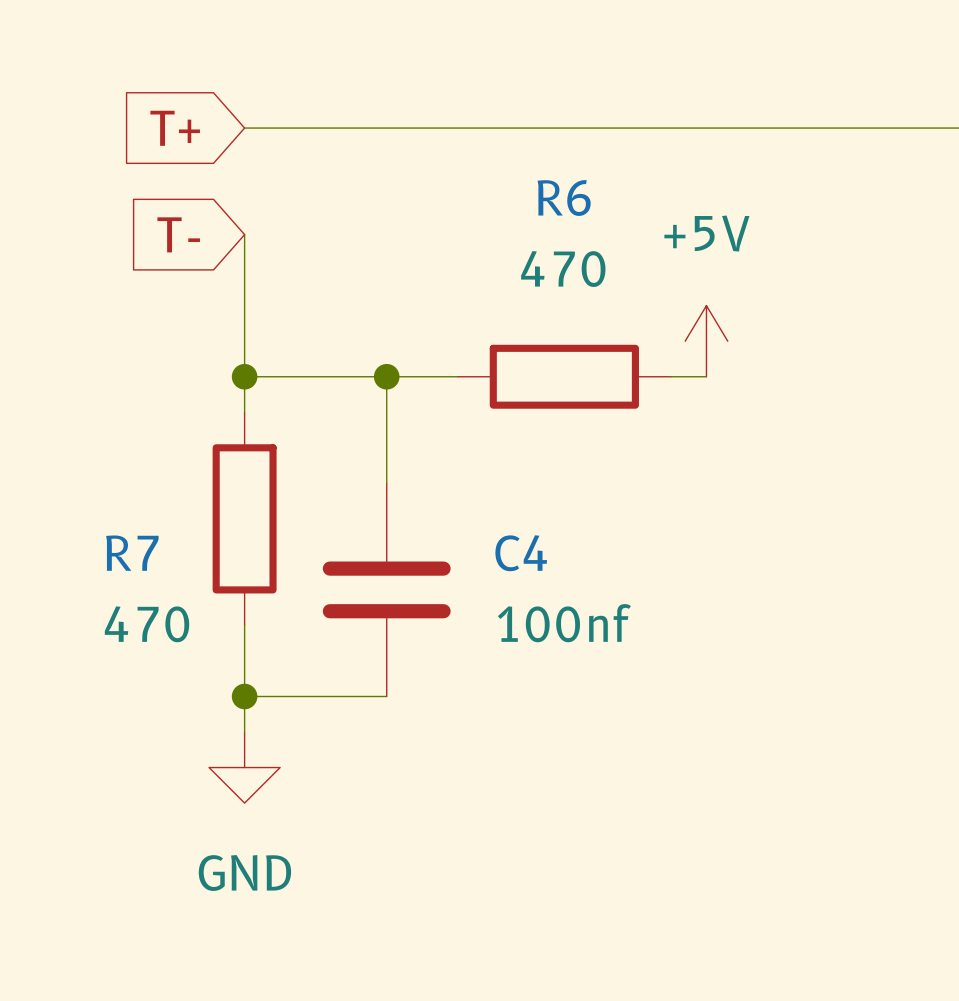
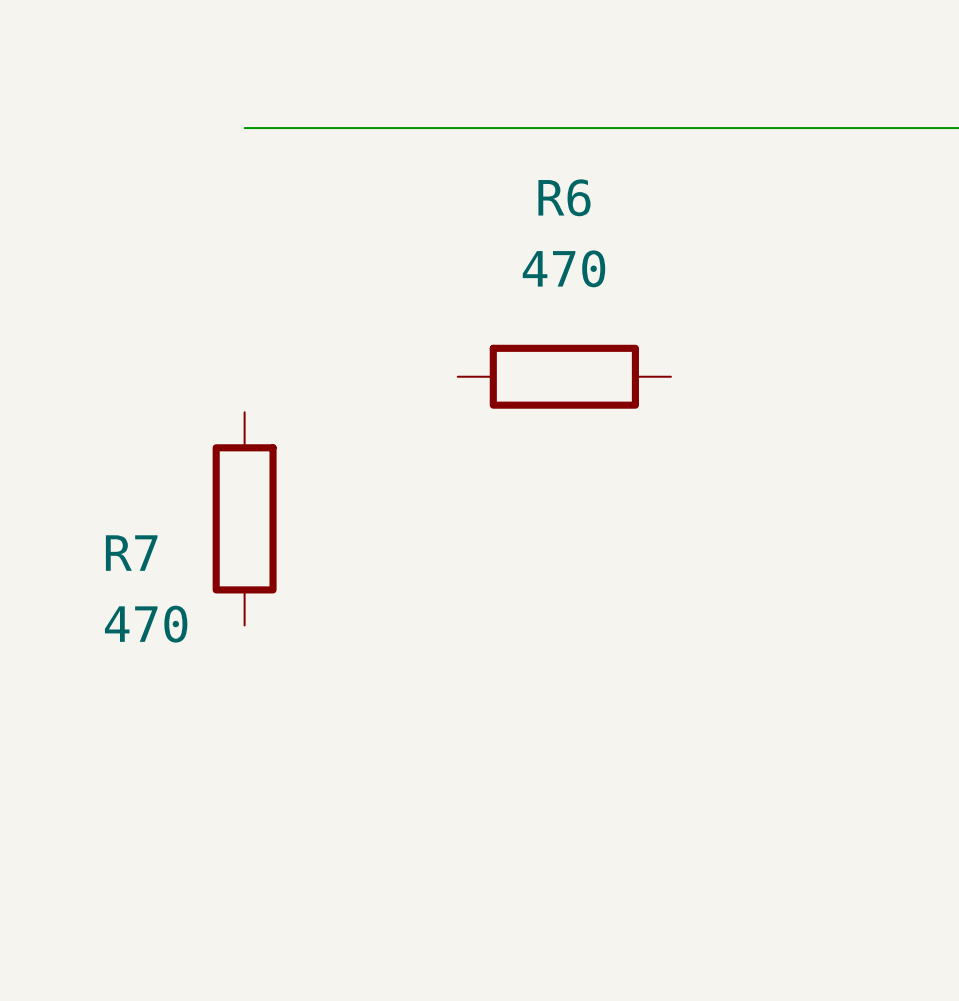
global label: T+ (175, 128) -> none
global label: T- (178, 234) -> none
wire: (244, 234) (244, 412) -> none
power symbol: +5V (706, 341) -> none
wire: (244, 376) (457, 376) -> none
junction: (244, 376) -> none
wire: (386, 376) (386, 483) -> none
junction: (386, 376) -> none
wire: (670, 376) (706, 376) -> none
C4: 100nf (386, 589) -> none
wire: (244, 625) (244, 732) -> none
wire: (244, 696) (386, 696) -> none
junction: (244, 696) -> none
power symbol: GND (244, 767) -> none

